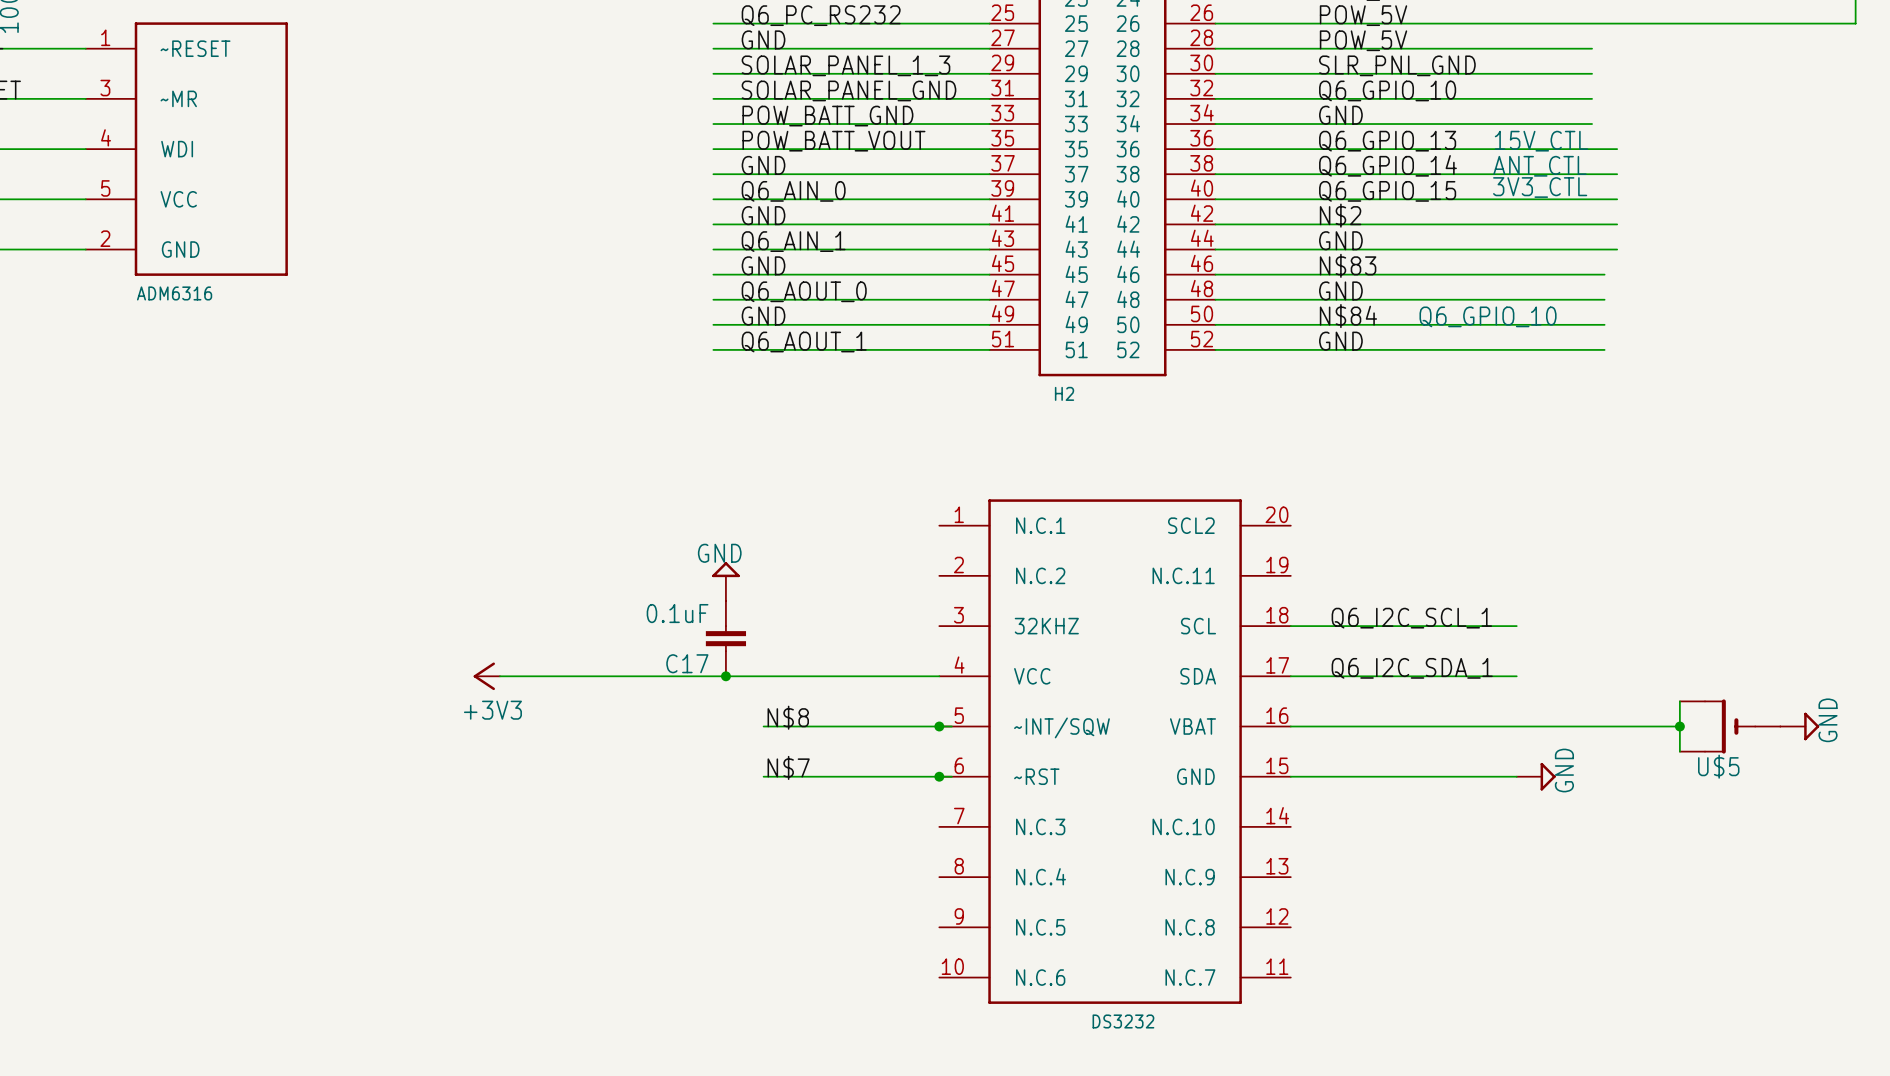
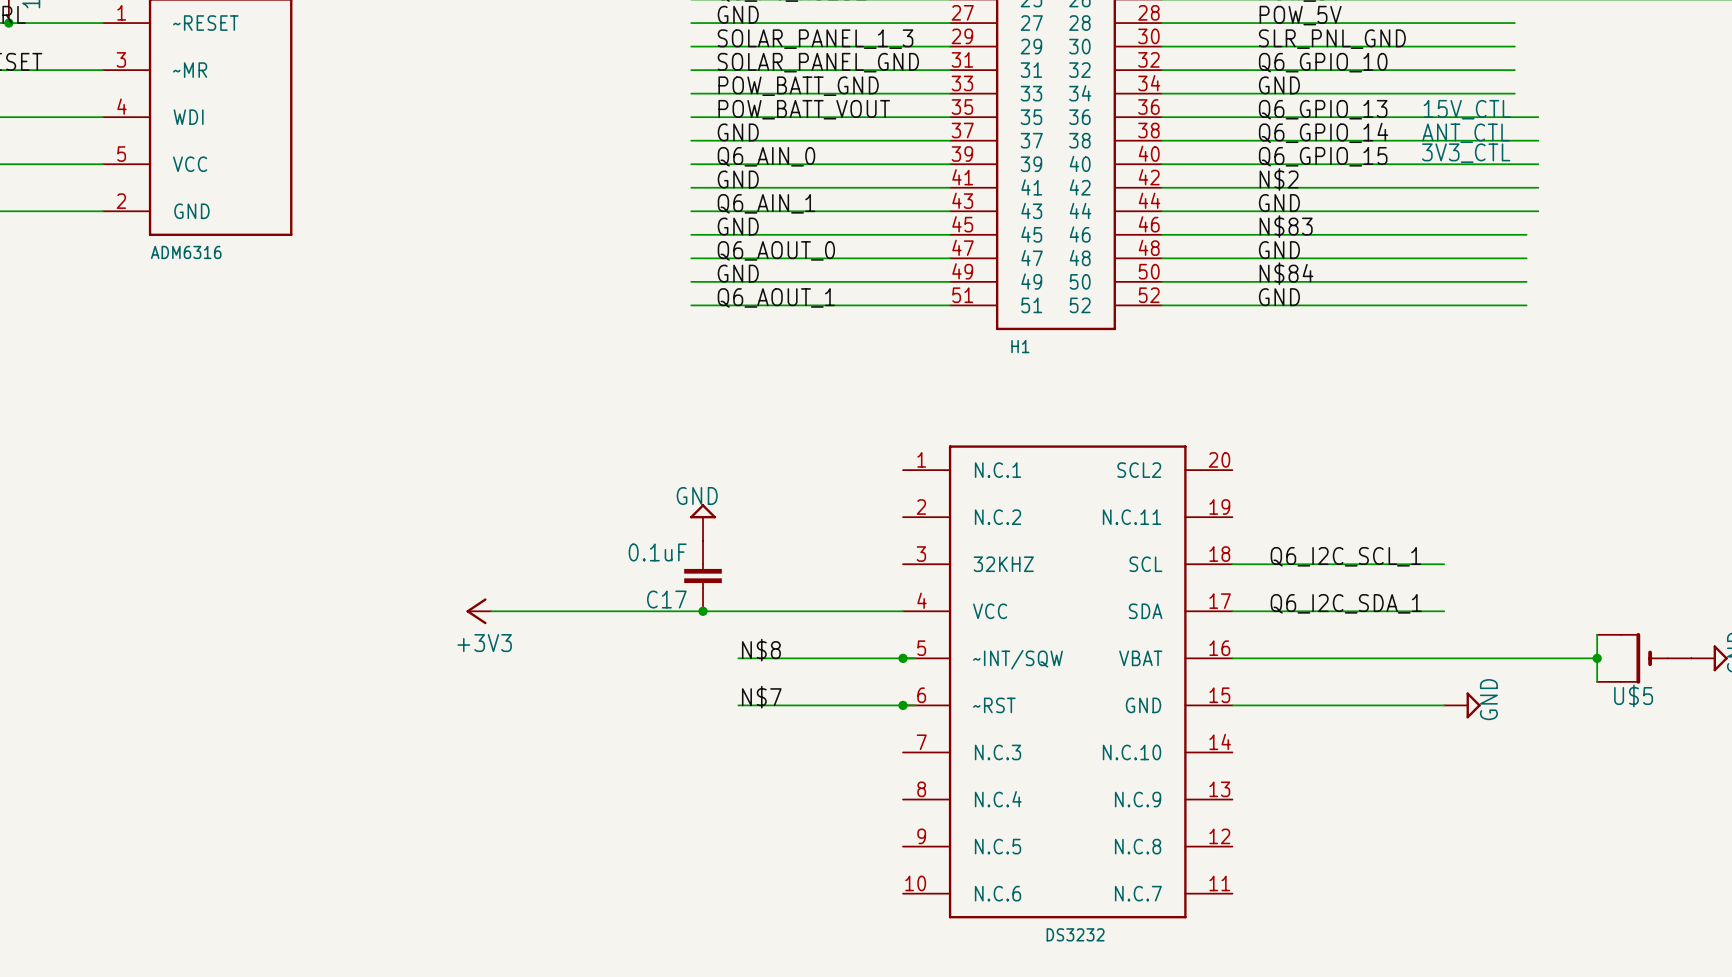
text: Q6_GPIO_10 (1488, 316) -> none
H2 name: H2 (1064, 393) -> H1 (1020, 346)

